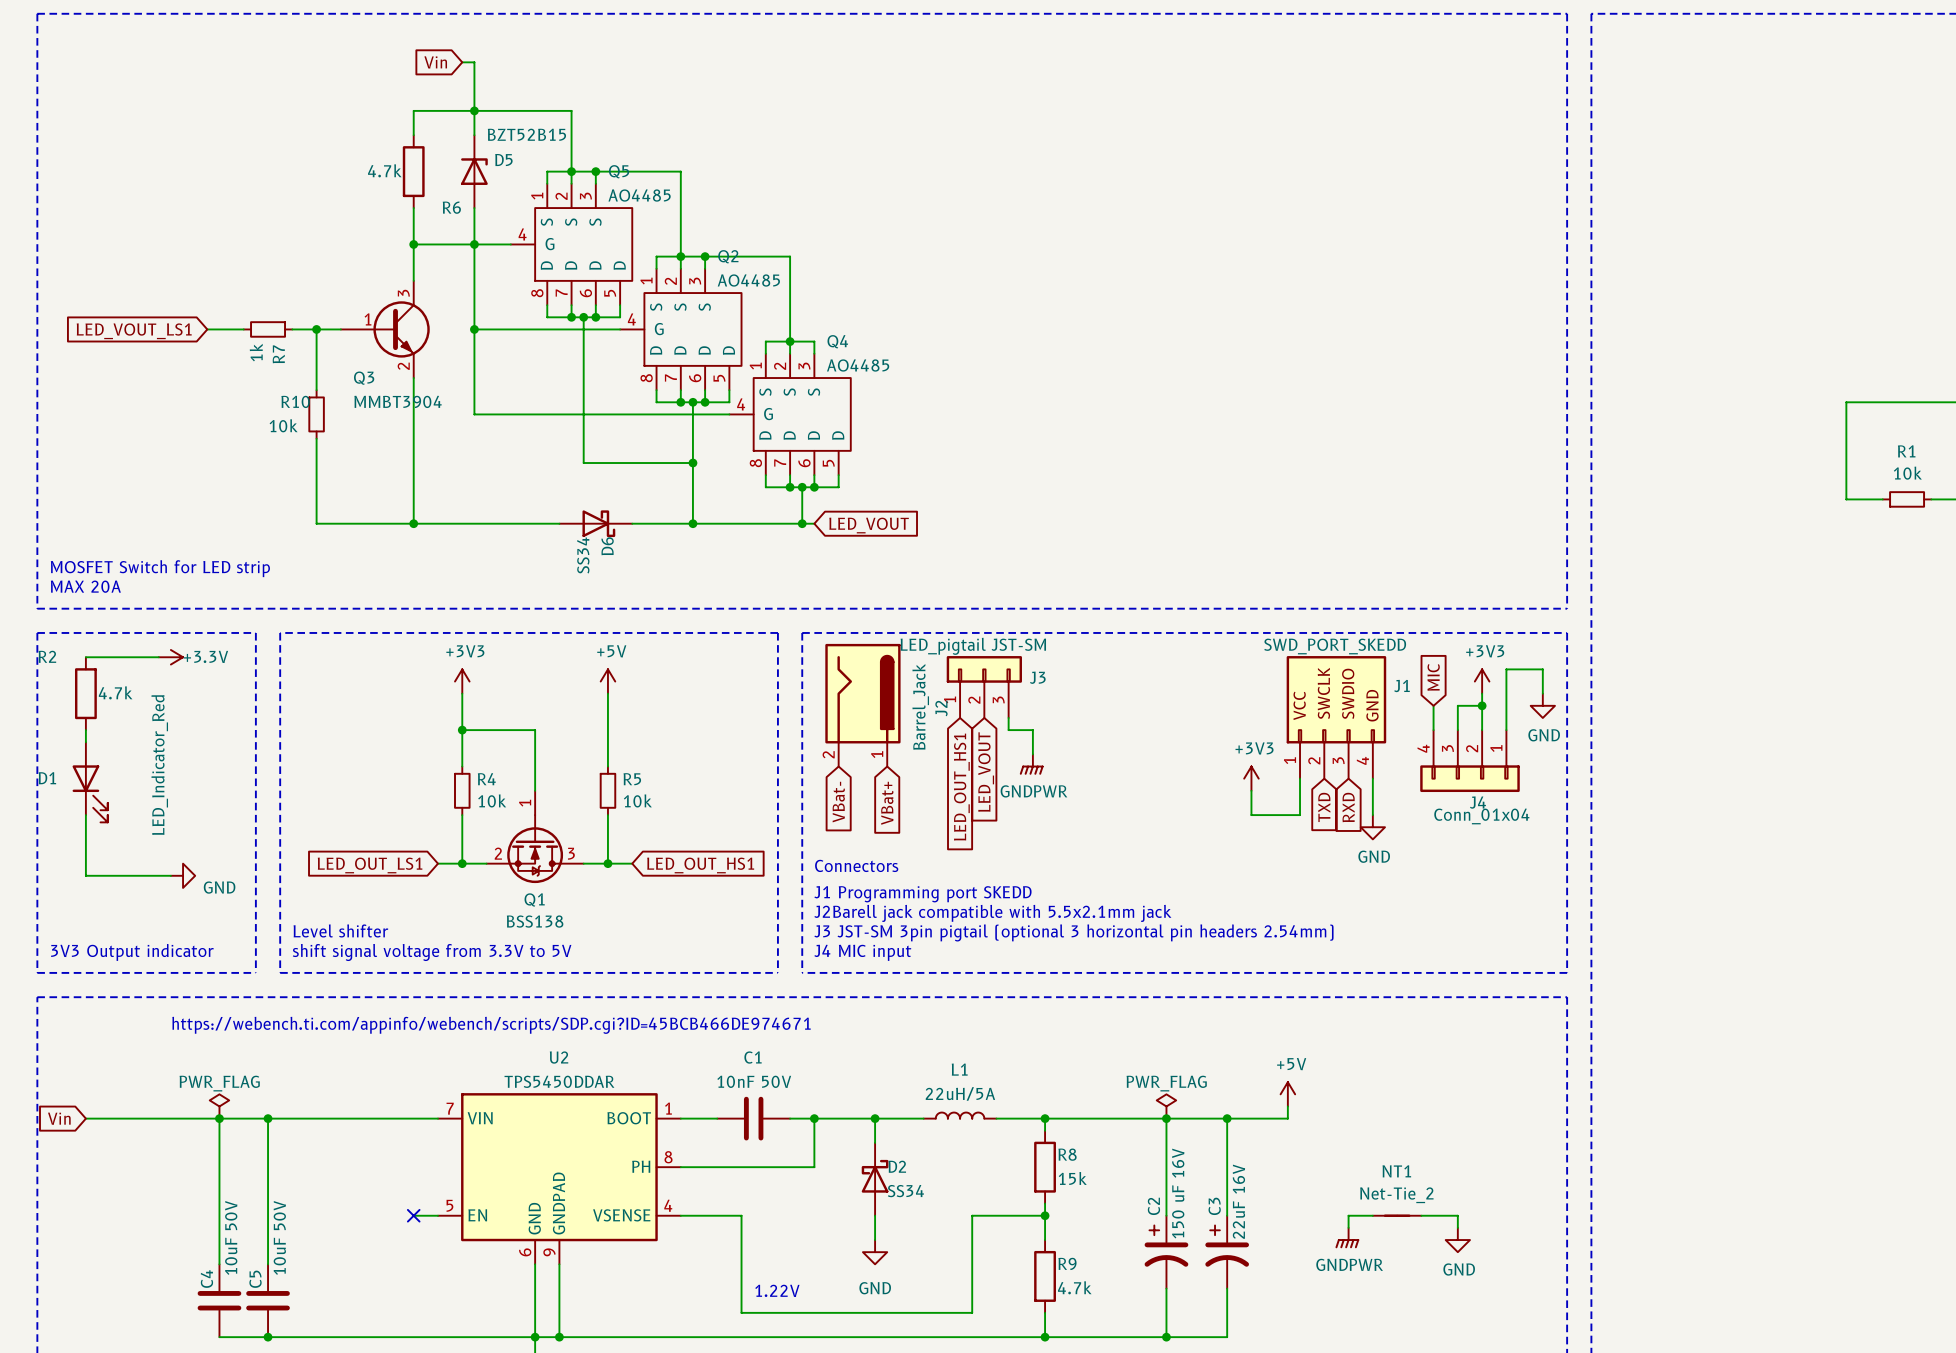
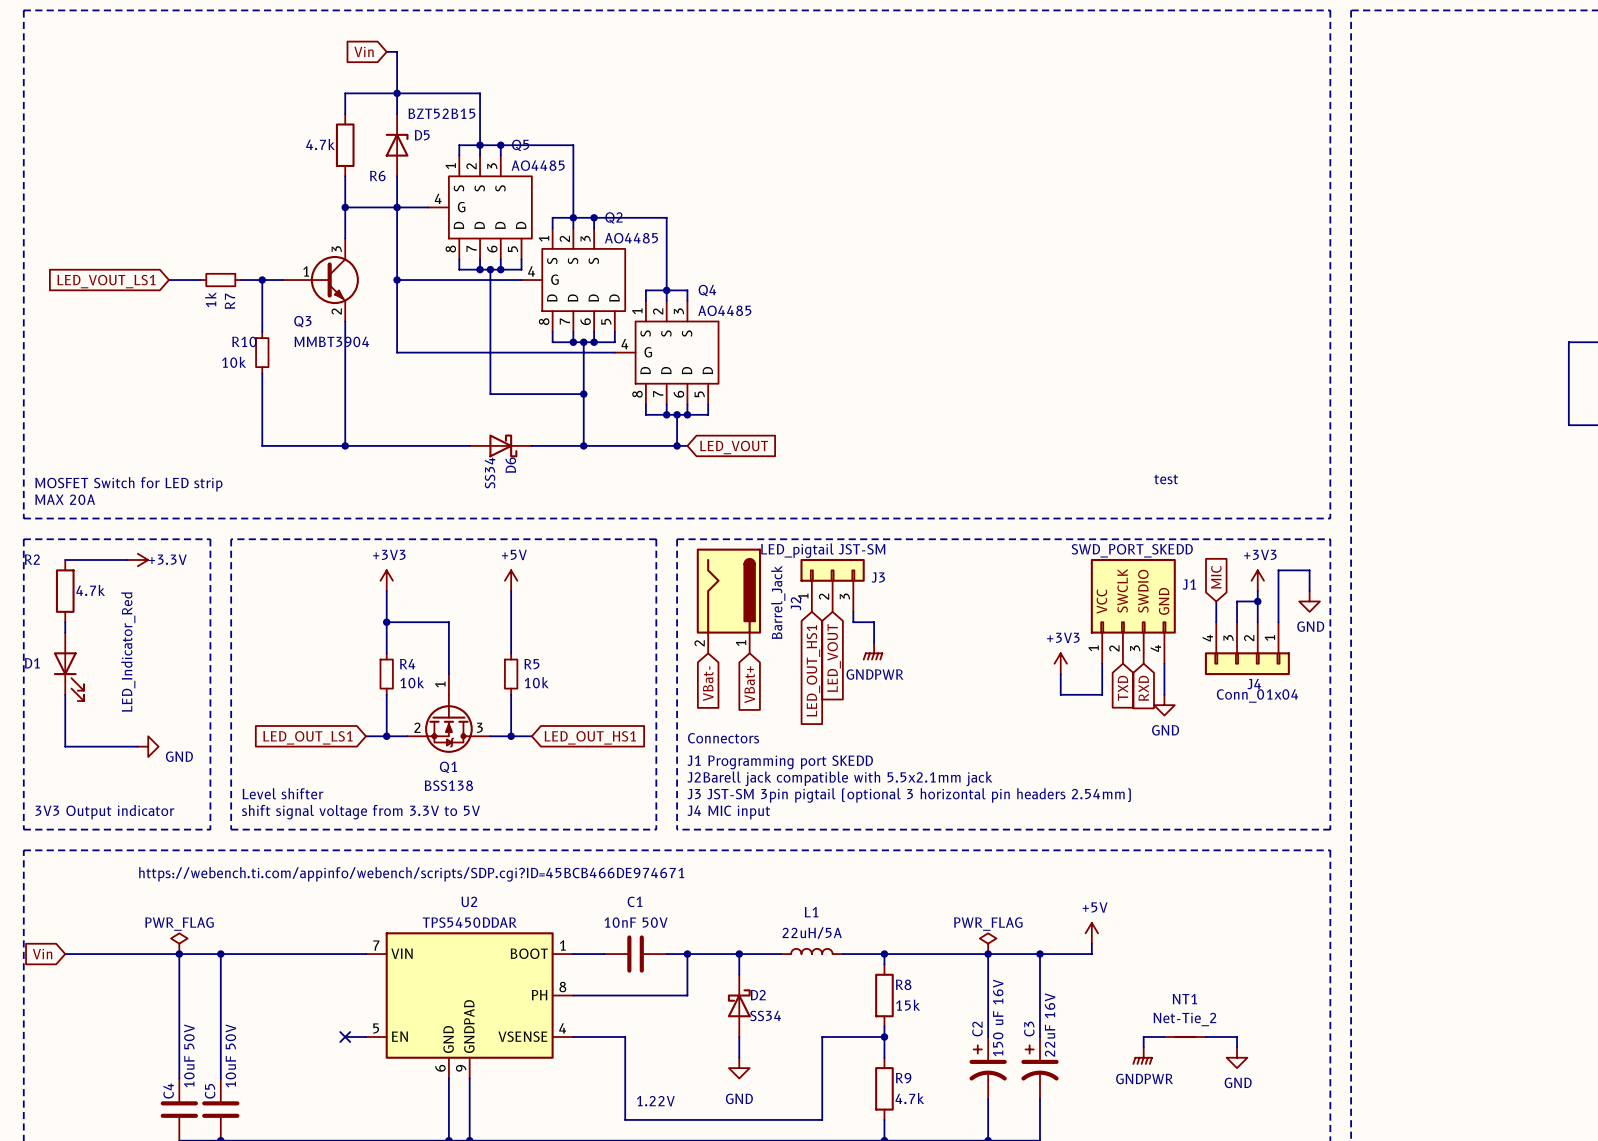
text: none -> test (1166, 479)

